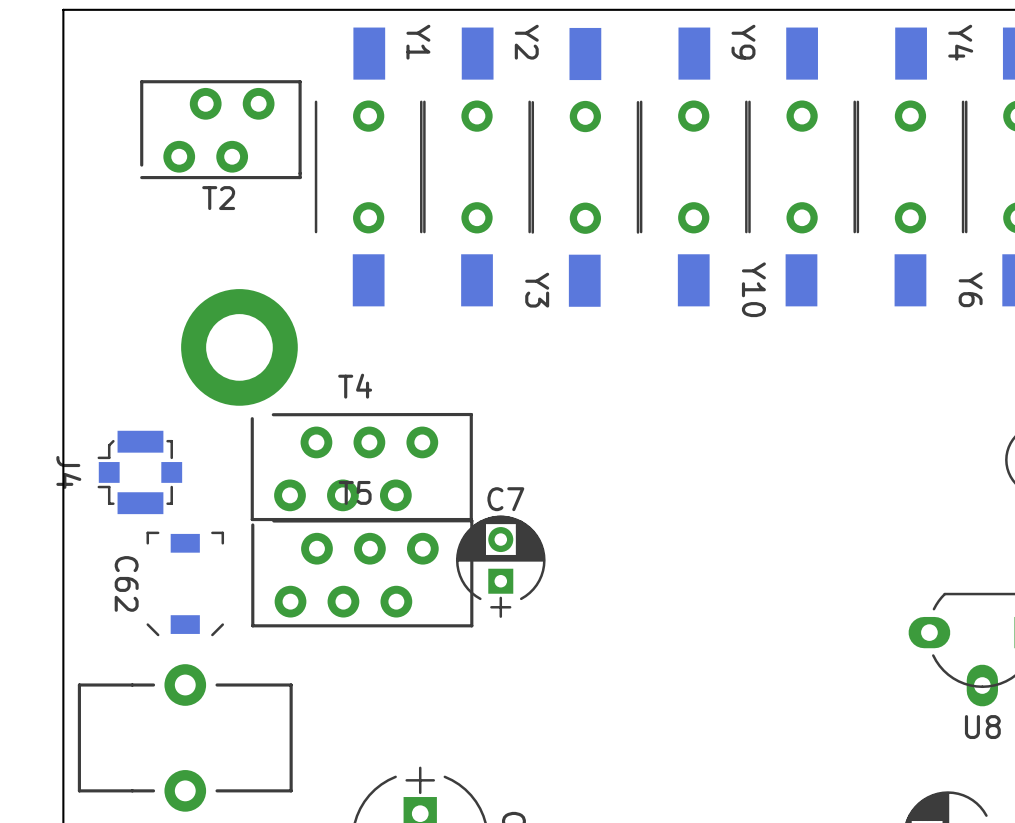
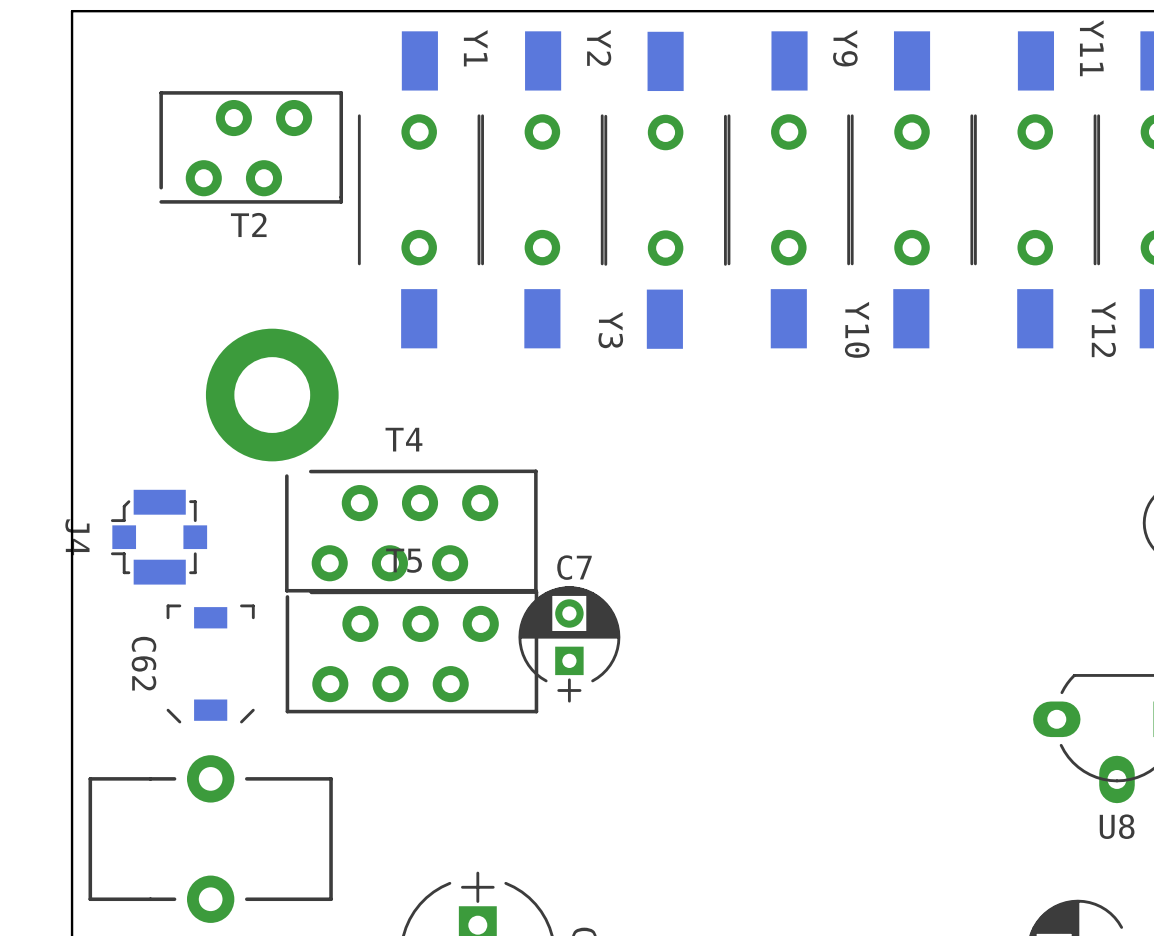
Y4 name: Y4 (960, 42) -> Y11 (1091, 48)
Y6 name: Y6 (970, 289) -> Y12 (1103, 329)

